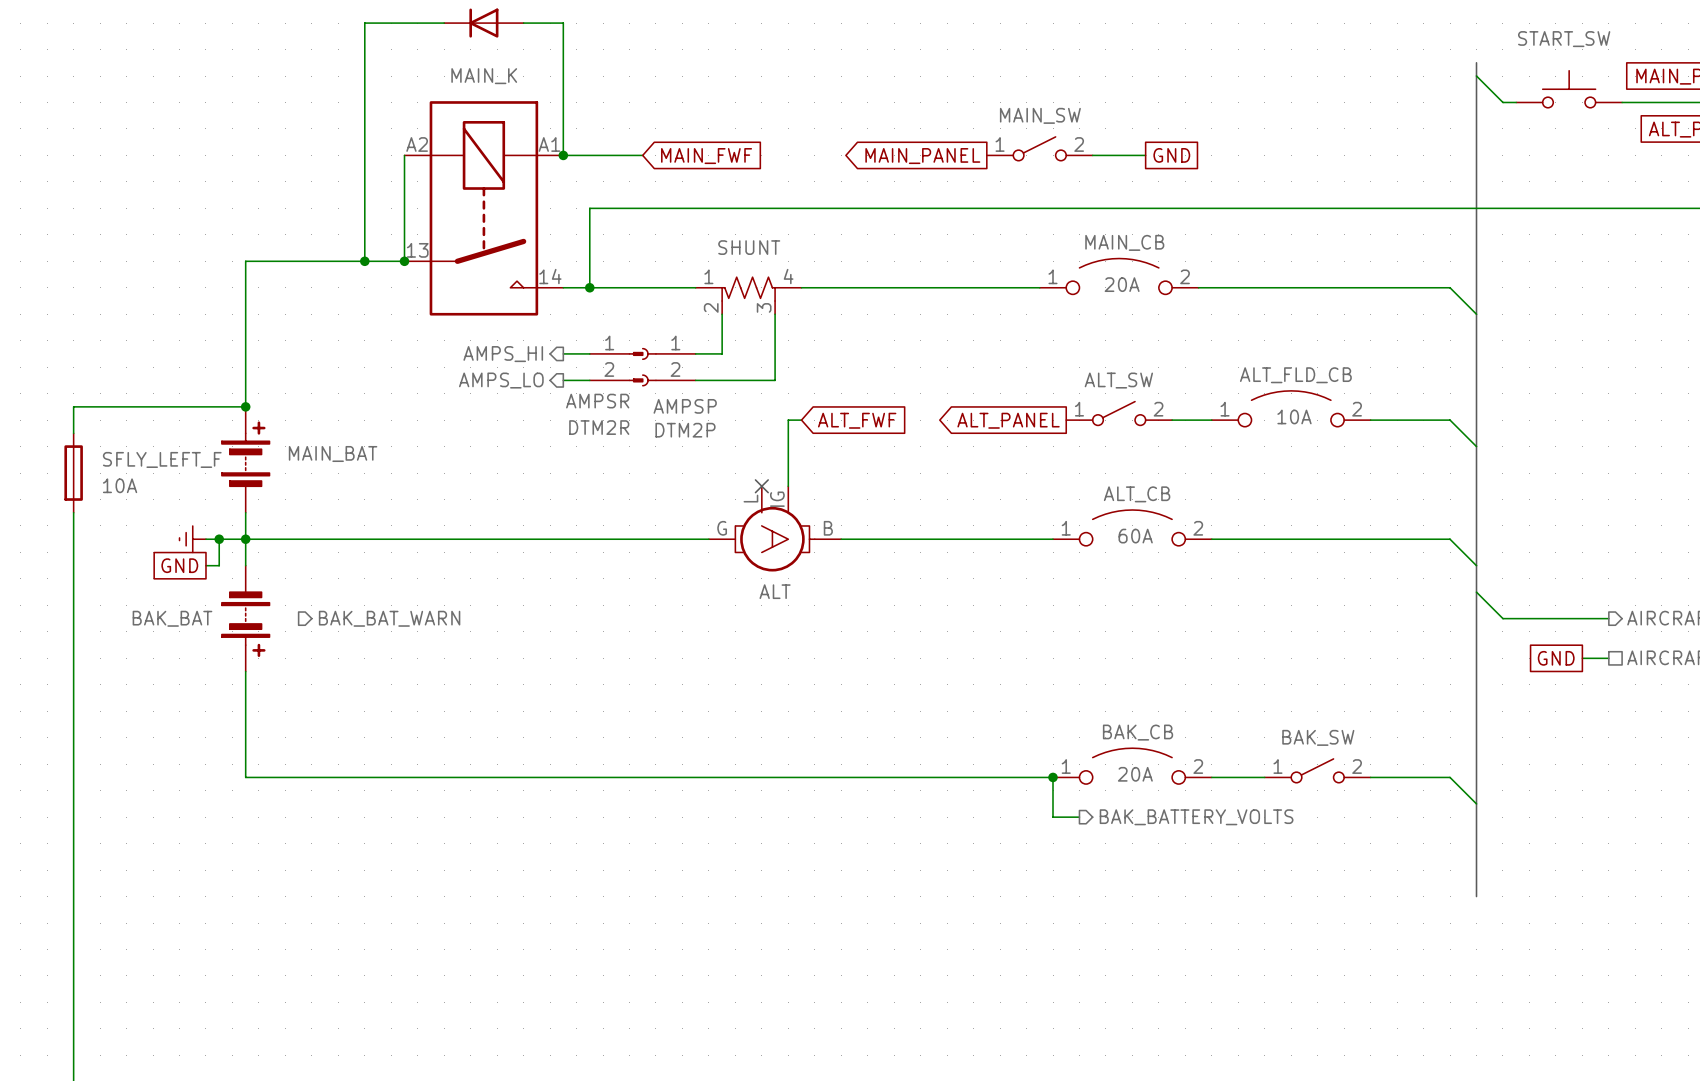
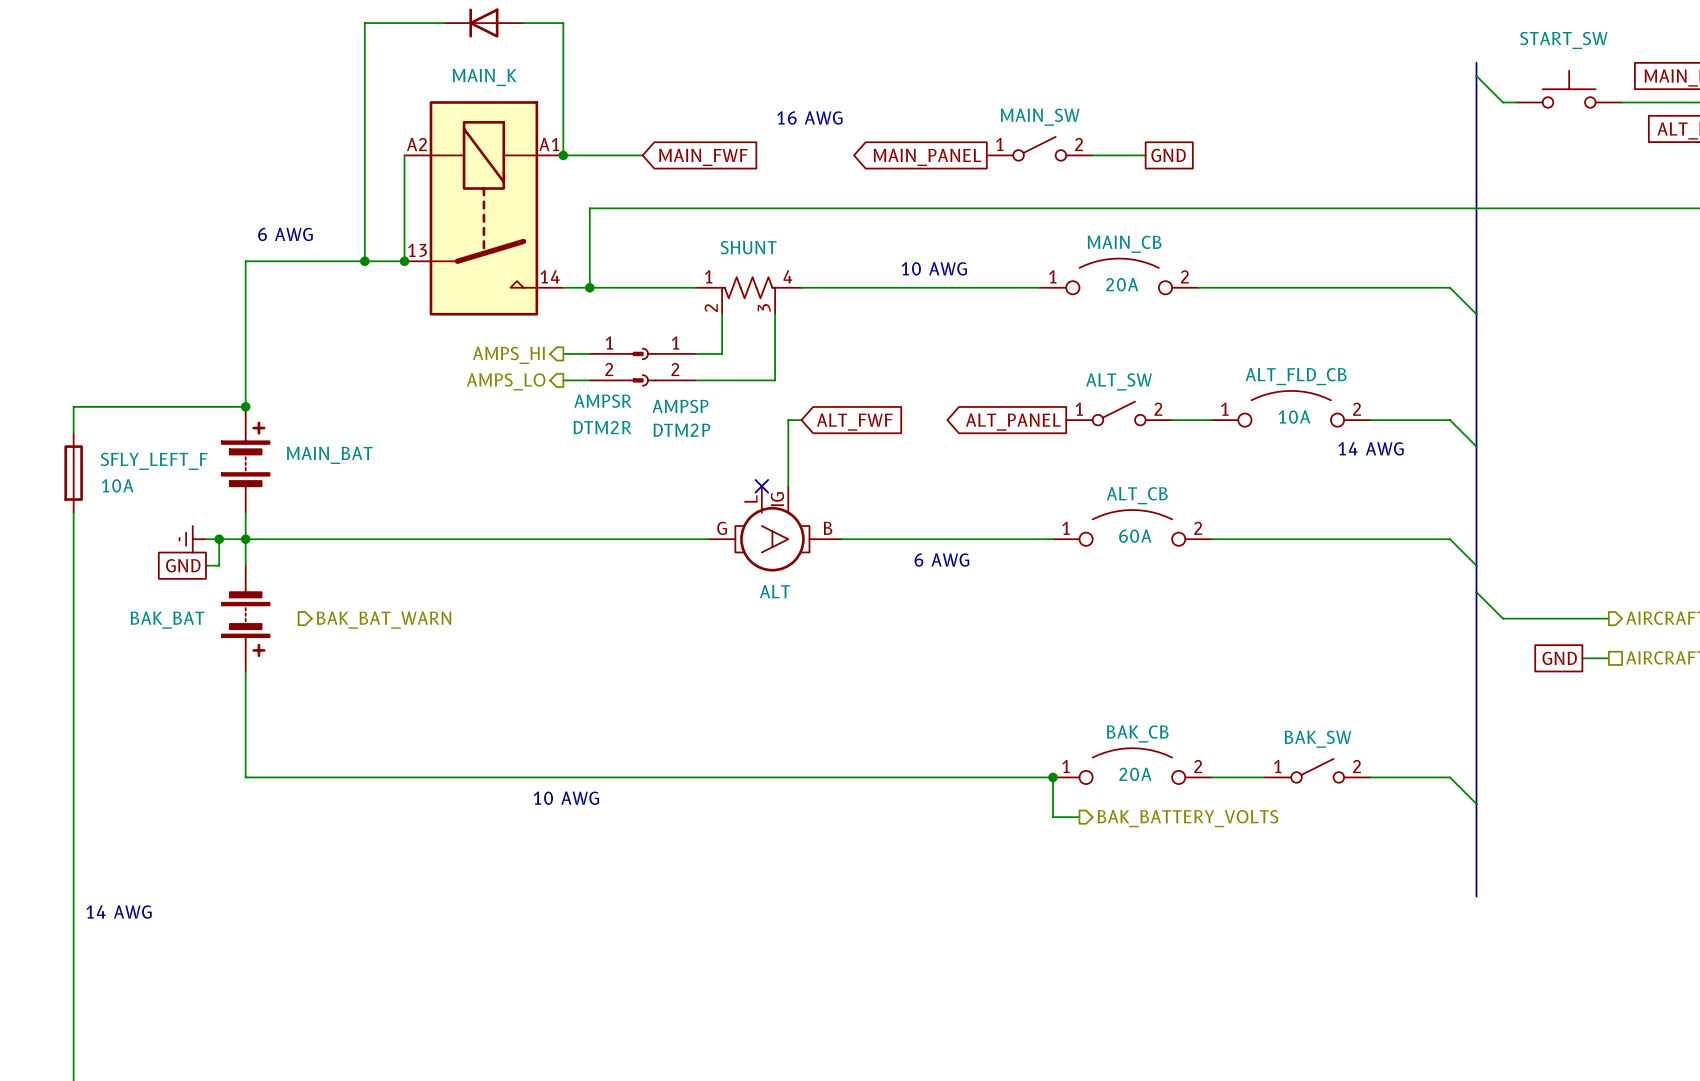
text: none -> 16 AWG (809, 117)
text: none -> 6 AWG (285, 234)
text: none -> 10 AWG (934, 268)
text: none -> 14 AWG (1371, 448)
text: none -> 6 AWG (941, 560)
text: none -> 10 AWG (566, 798)
text: none -> 14 AWG (119, 912)

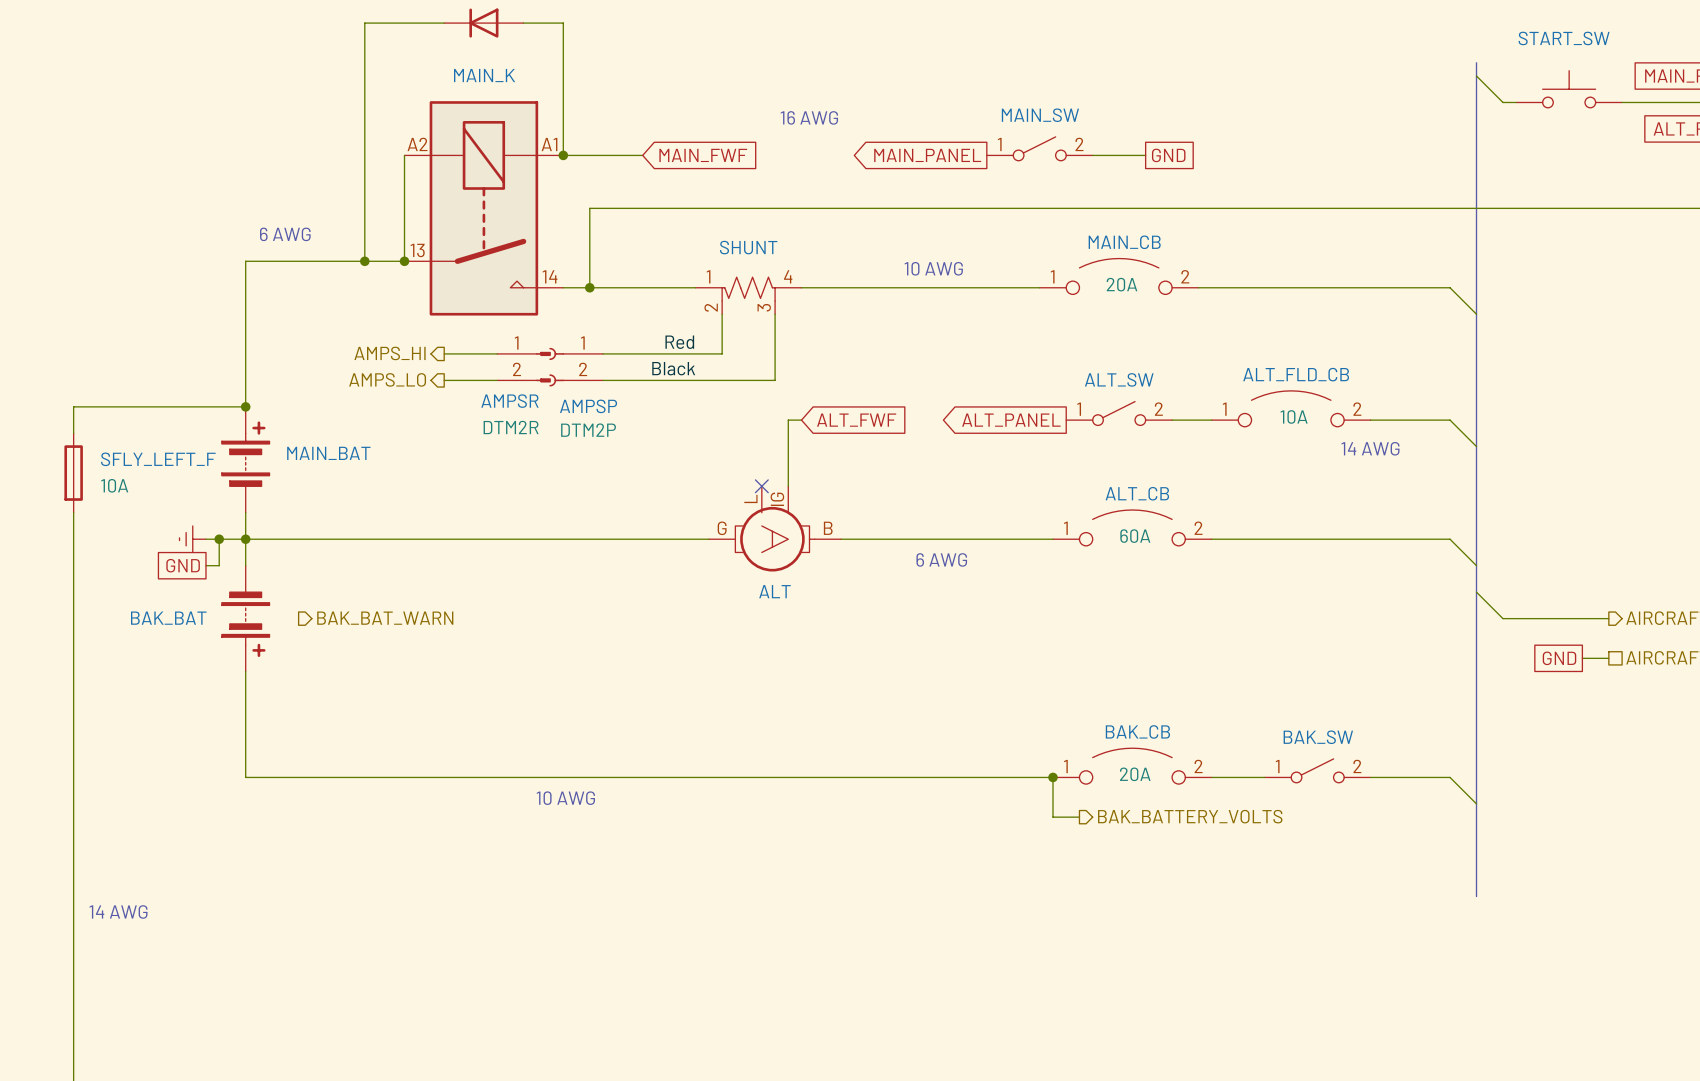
label: none -> Red (679, 342)
wire: none -> (444, 353) (497, 353)
hierarchical label position: AMPS_HI (508, 355) -> AMPS_HI (390, 353)
AMPSR position: (616, 367) -> (524, 367)
AMPSP position: (668, 367) -> (576, 367)
label: none -> Black (673, 368)
wire: none -> (444, 380) (497, 380)
hierarchical label position: AMPS_LO (506, 381) -> AMPS_LO (387, 379)

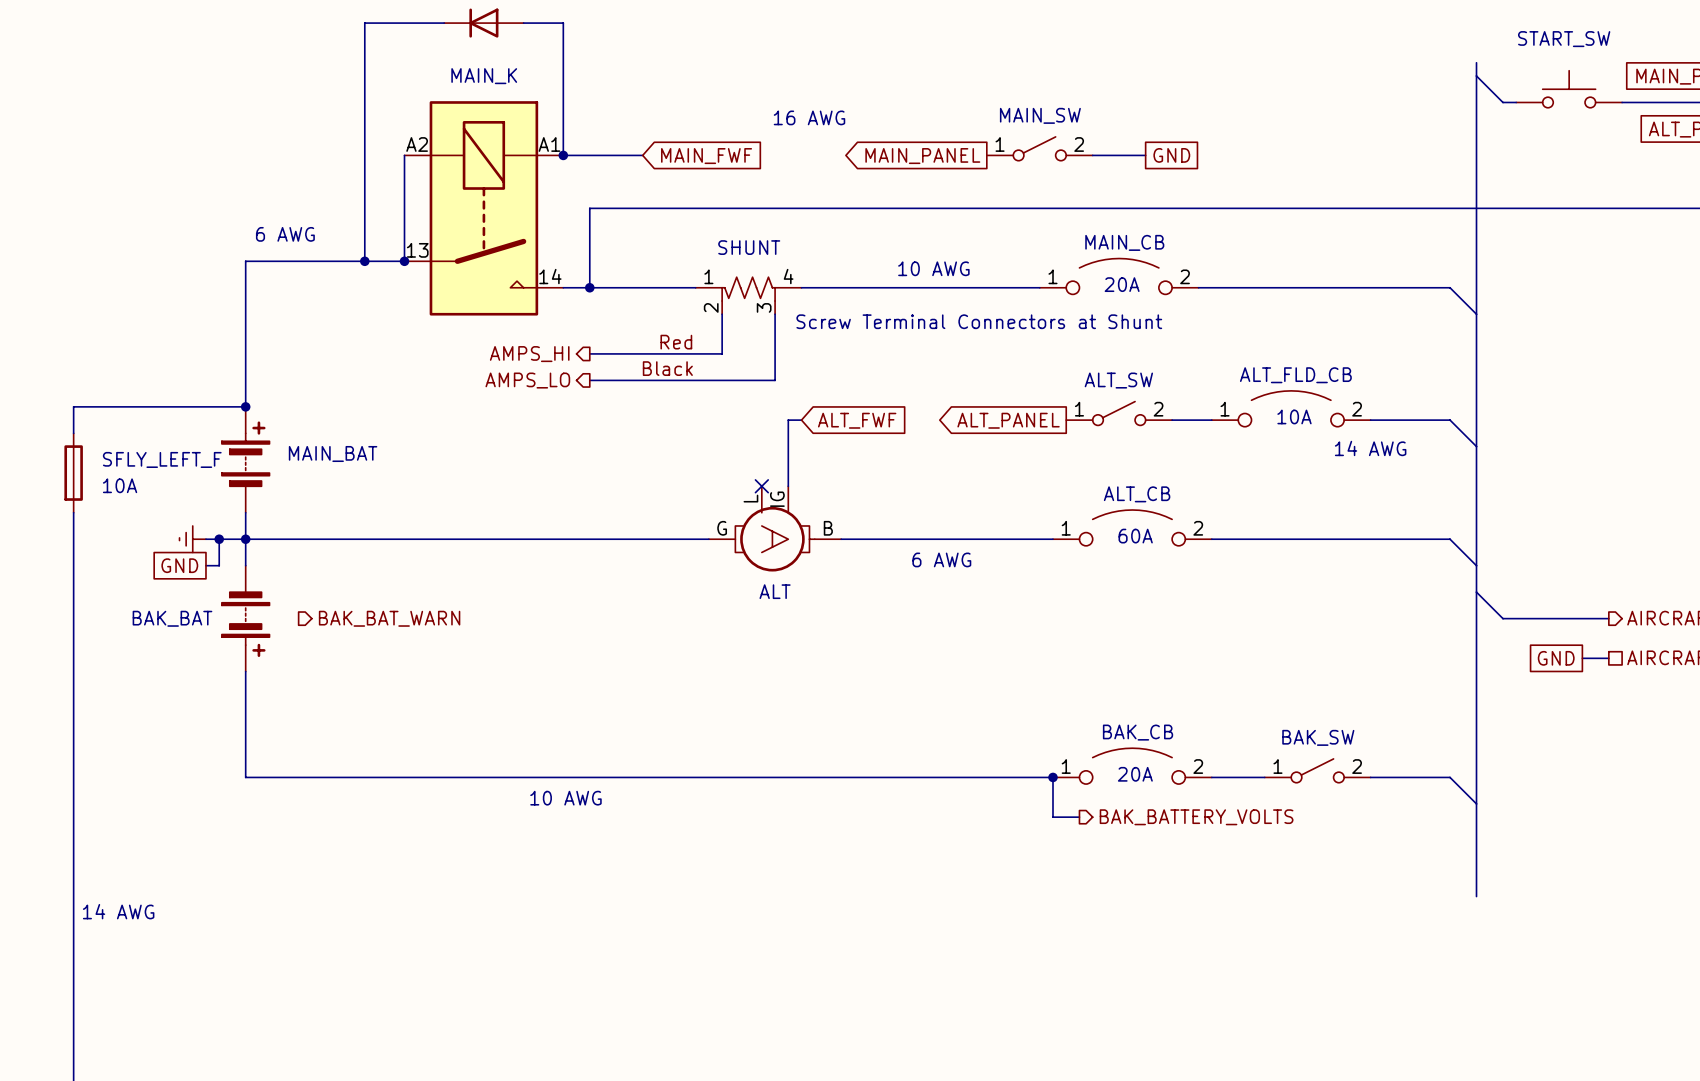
text: none -> Screw Terminal Connectors at Shunt (979, 321)
hierarchical label position: AMPS_HI (390, 353) -> AMPS_HI (529, 354)
wire: (444, 353) (497, 353) -> none
AMPSR: DTM2R (524, 367) -> none
AMPSP: DTM2P (576, 367) -> none
hierarchical label position: AMPS_LO (387, 379) -> AMPS_LO (527, 380)
wire: (444, 380) (497, 380) -> none

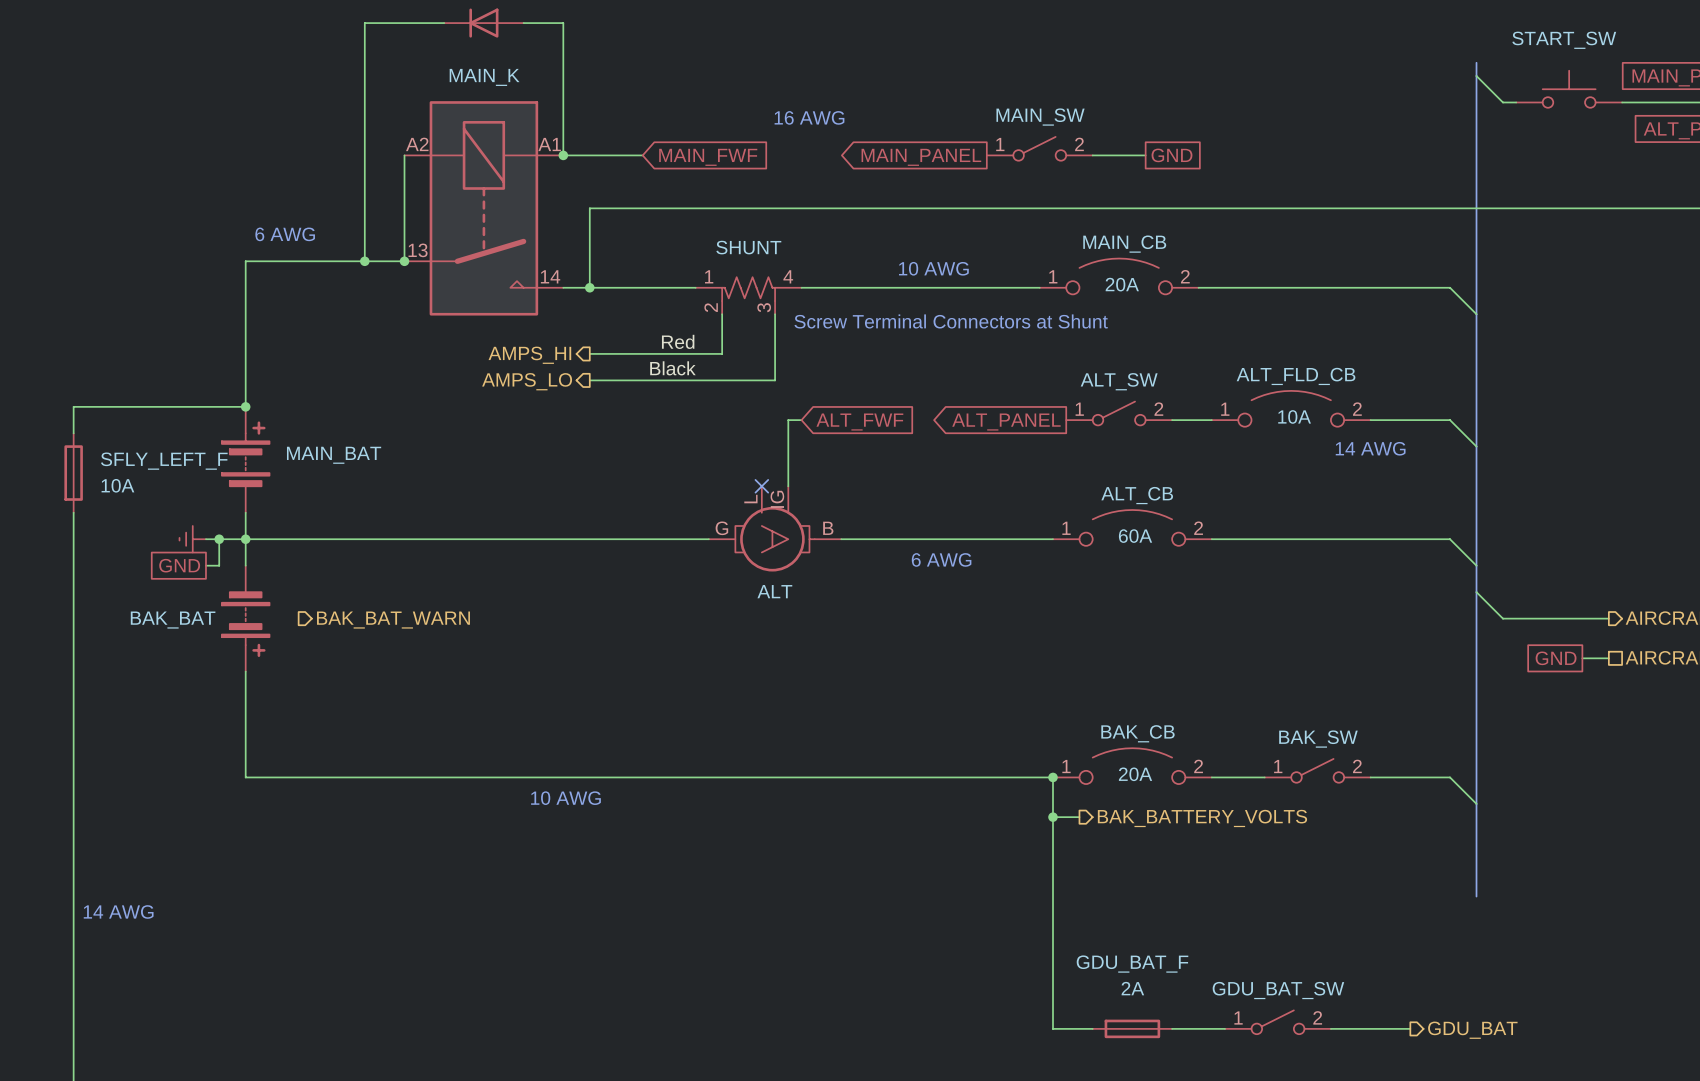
wire: none -> (1053, 817) (1053, 1028) (1092, 1028)
junction: none -> (1053, 817)
GDU_BAT_SW: none -> (1277, 1022)
GDU_BAT_F: none -> 2A (1132, 1028)
wire: none -> (1172, 1028) (1225, 1028)
wire: none -> (1330, 1028) (1410, 1028)
hierarchical label: none -> GDU_BAT (1472, 1030)

